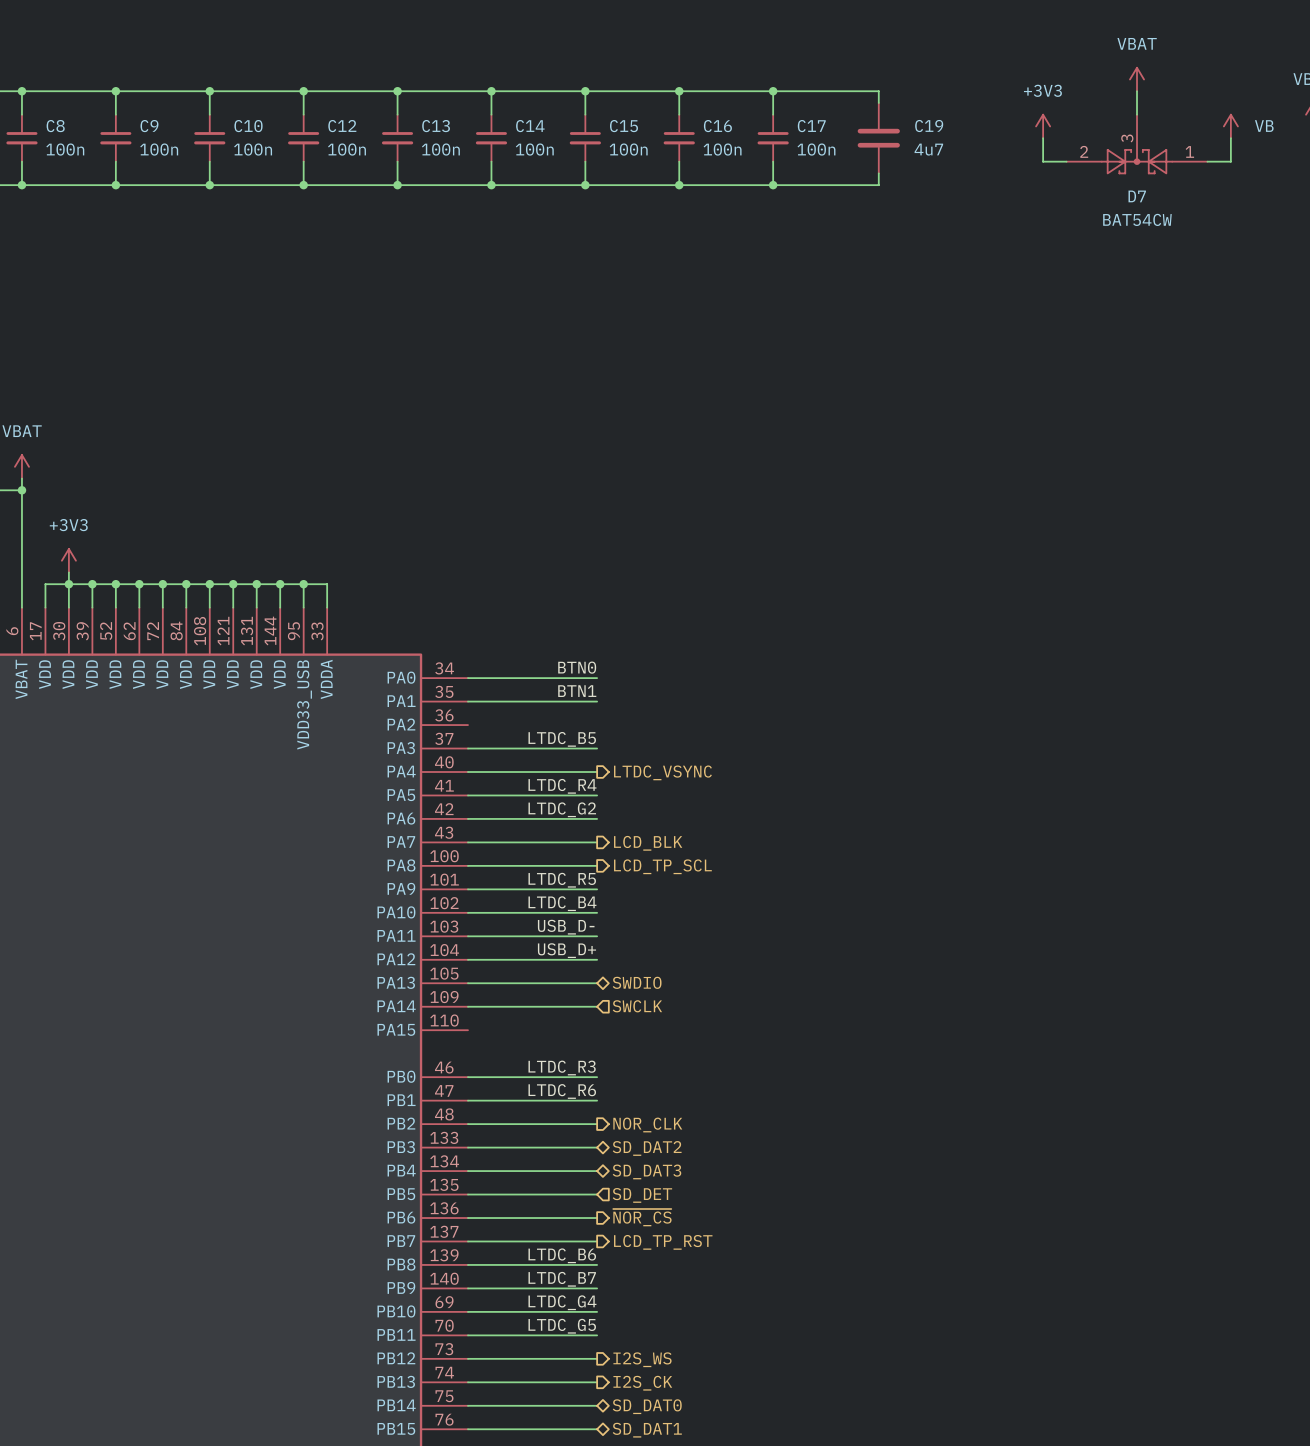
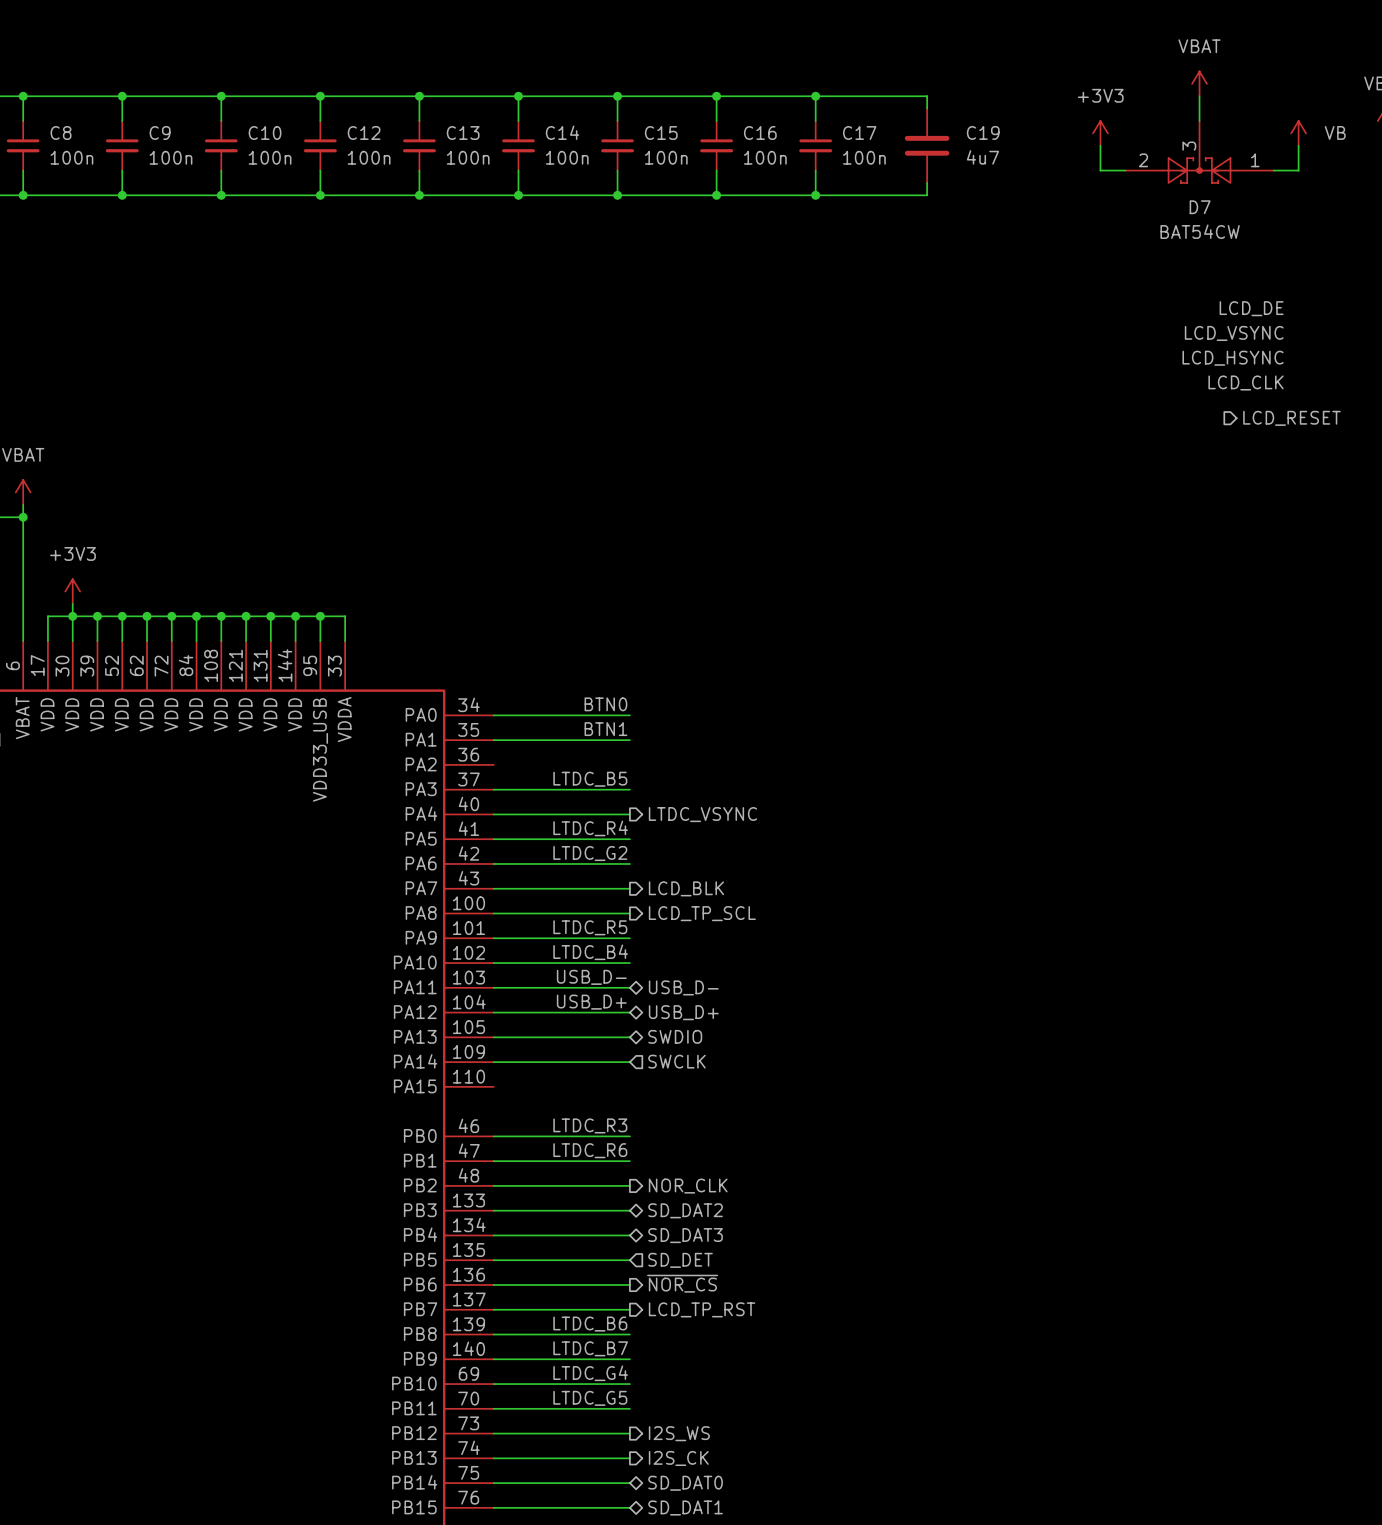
label: none -> LCD_DE (1251, 308)
label: none -> LCD_VSYNC (1234, 333)
label: none -> LCD_HSYNC (1233, 358)
label: none -> LCD_CLK (1246, 382)
hierarchical label: none -> LCD_RESET (1292, 418)
hierarchical label: none -> USB_D- (683, 987)
hierarchical label: none -> USB_D+ (683, 1012)

